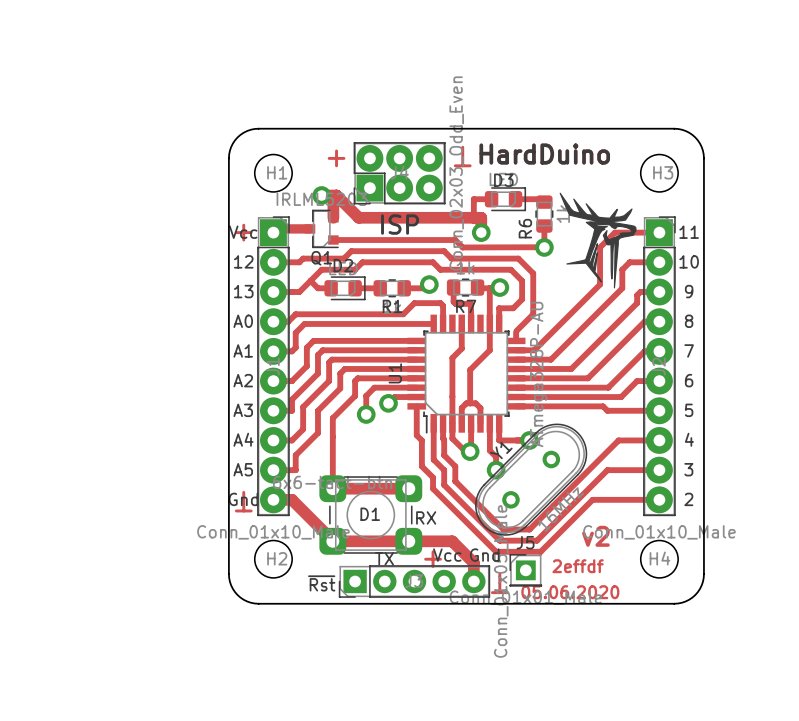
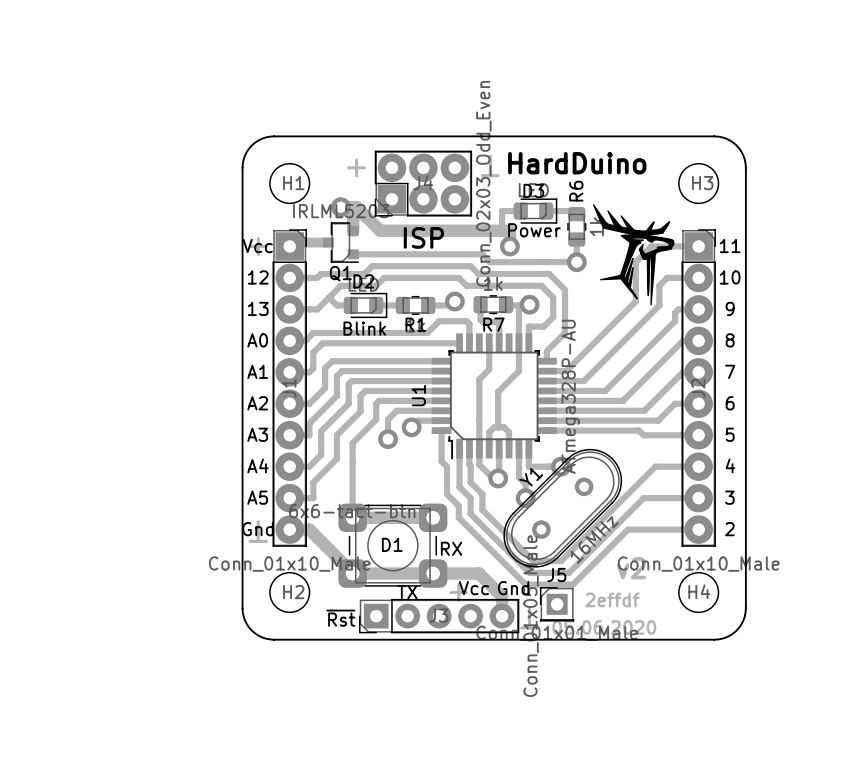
text: none -> Power (534, 230)
R6 name position: R6 (525, 228) -> R6 (576, 191)
text: none -> Blink (364, 328)

